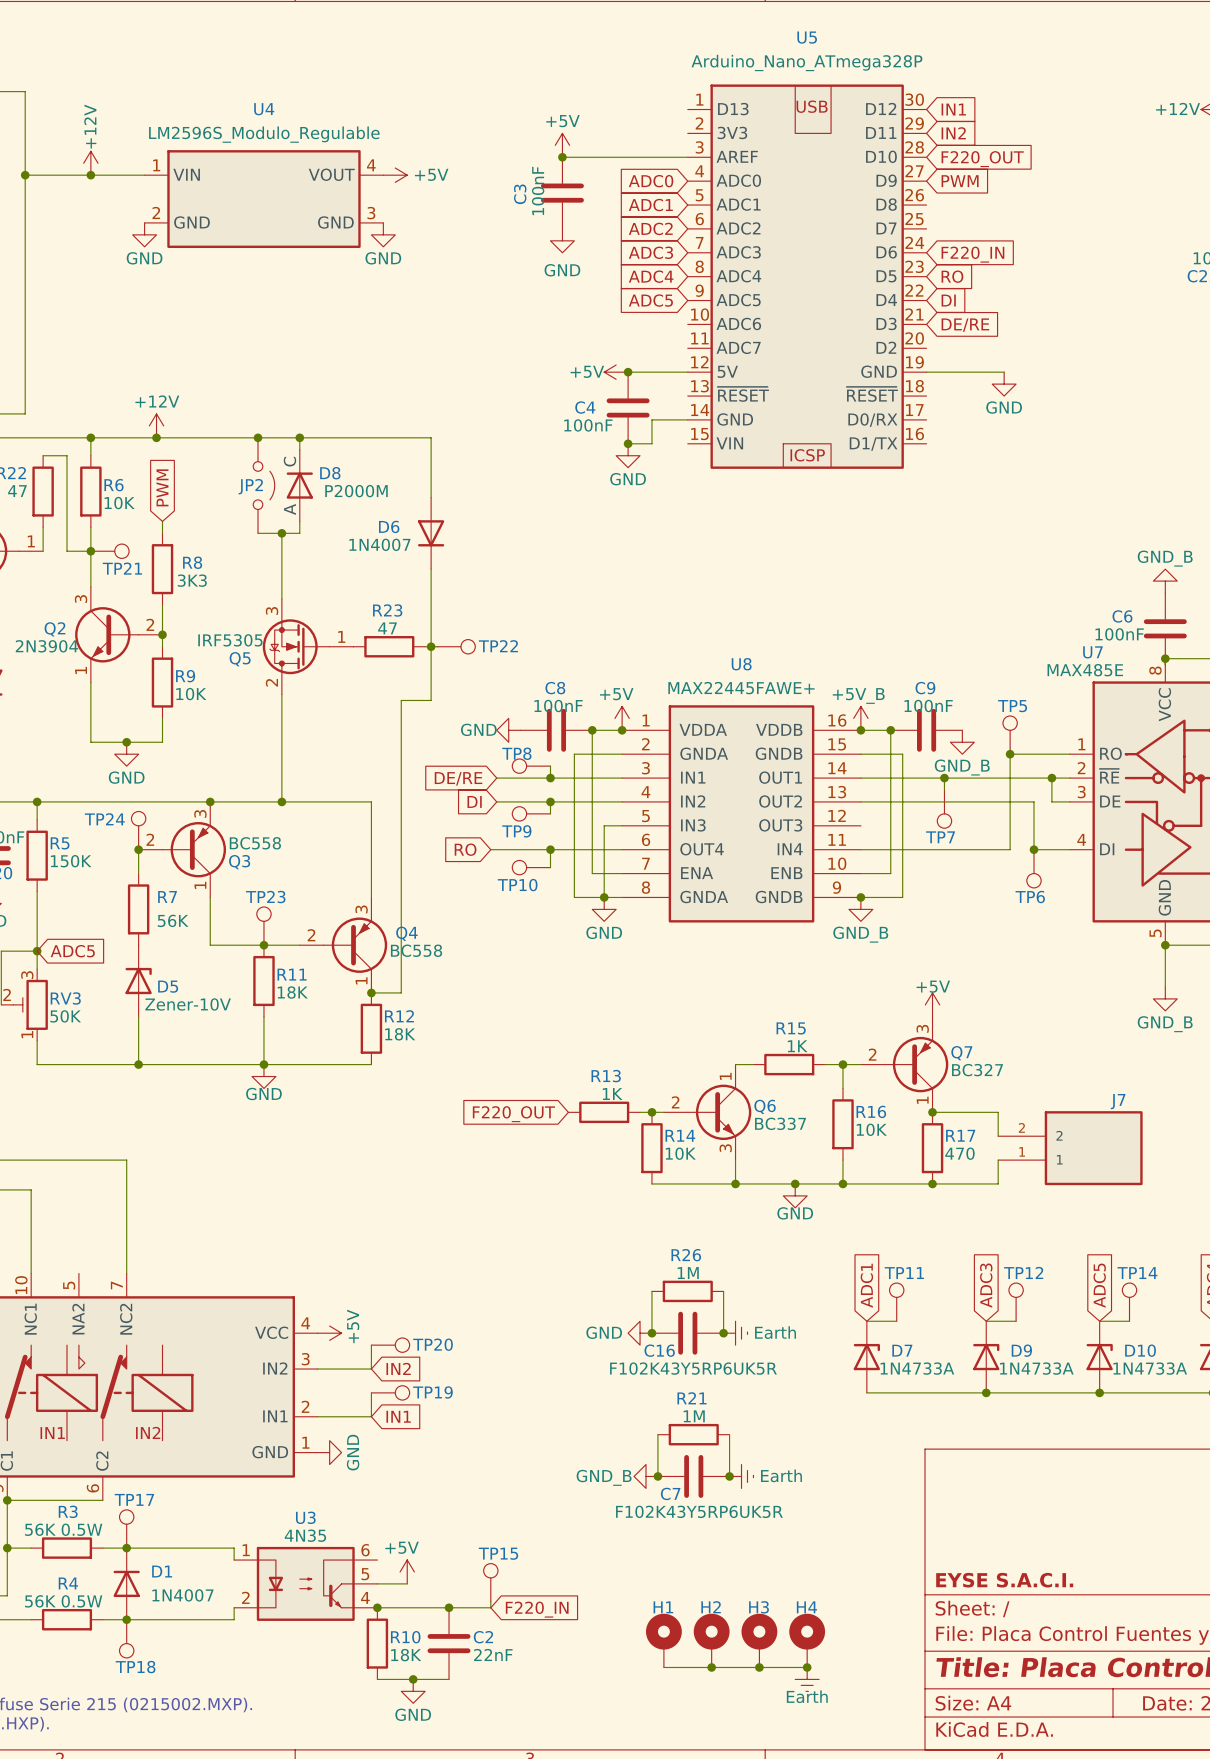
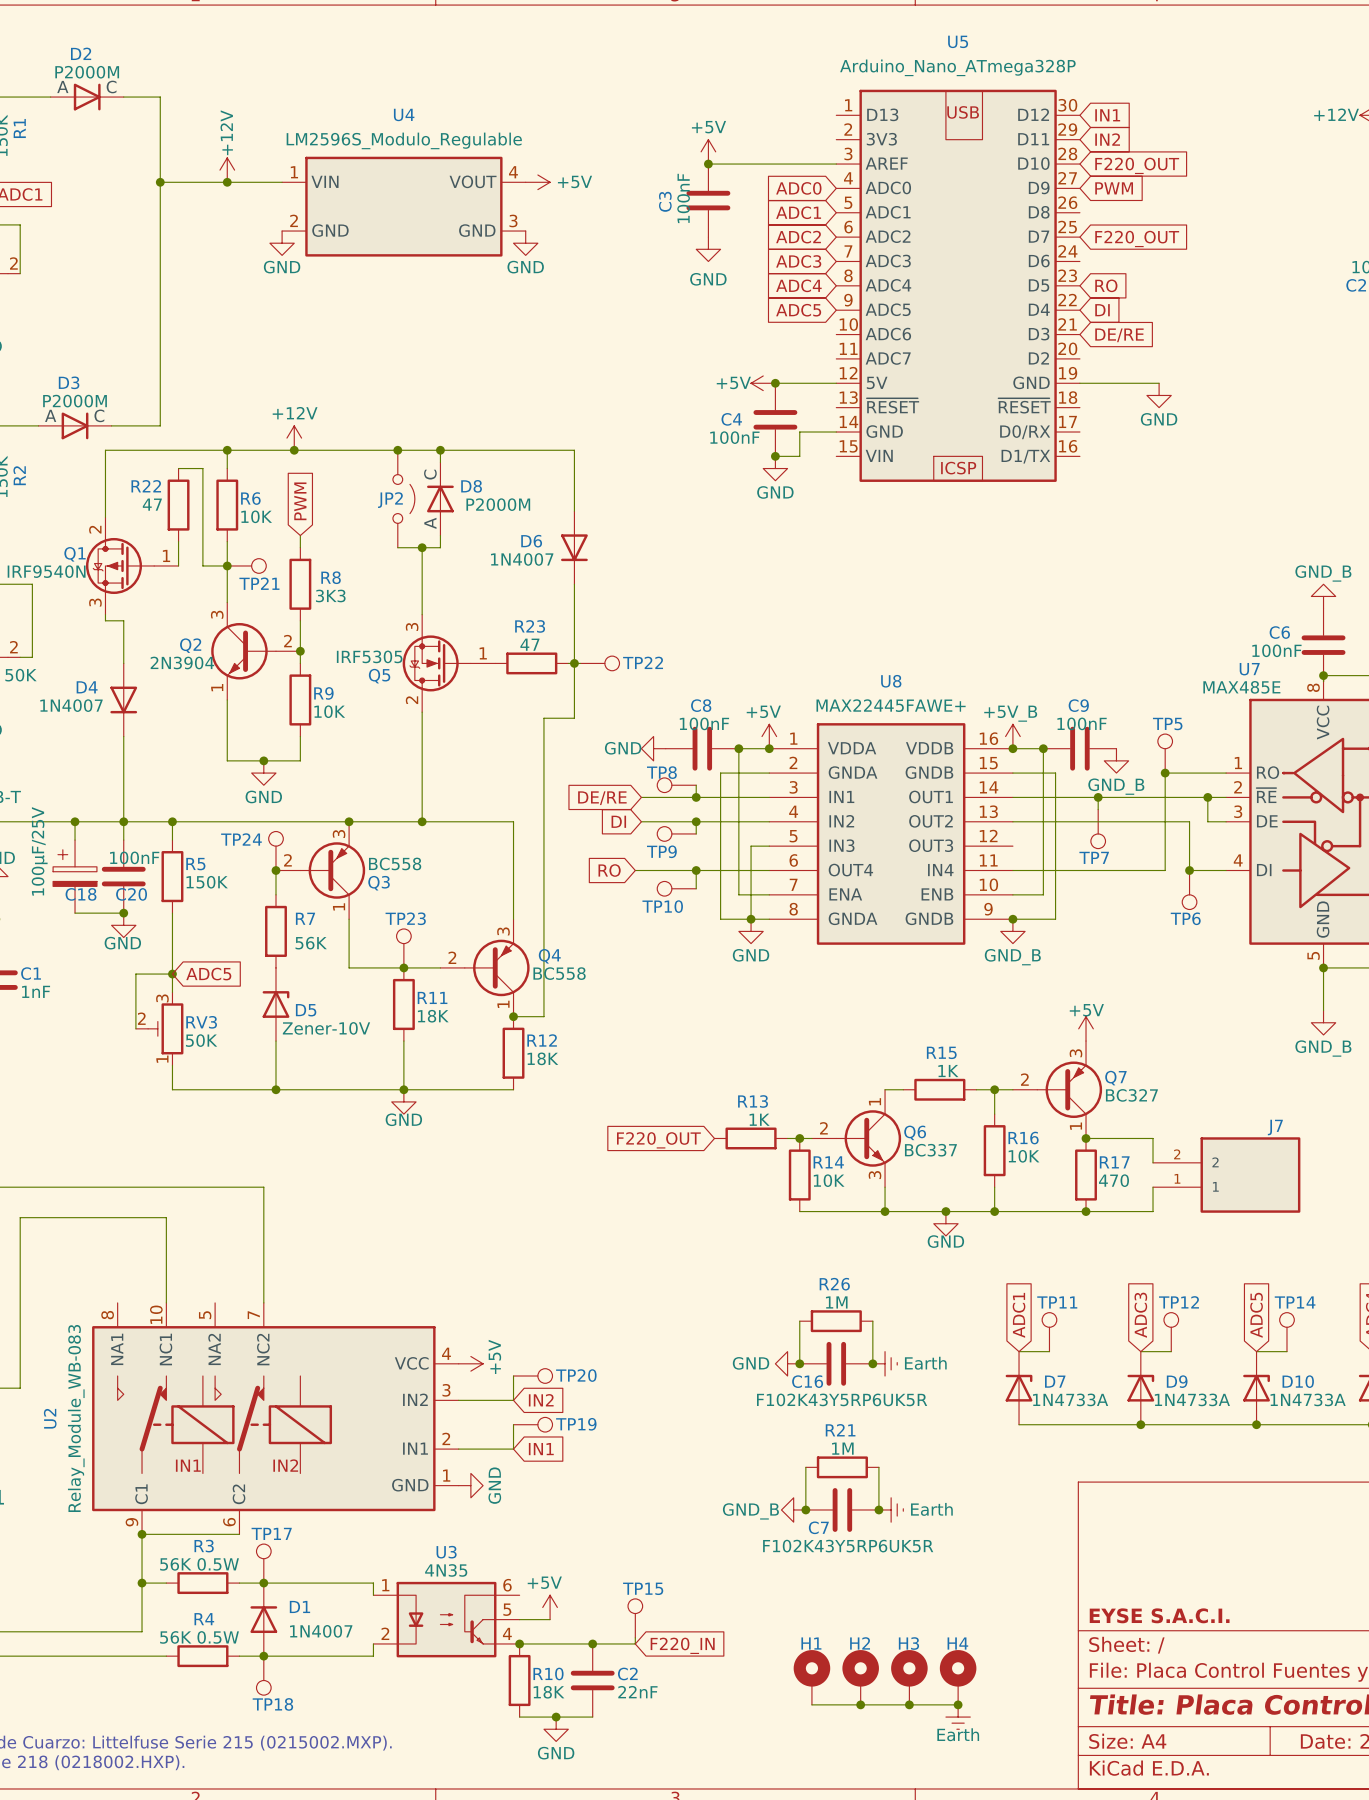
global label: F220_IN (972, 254) -> F220_OUT (1137, 238)

